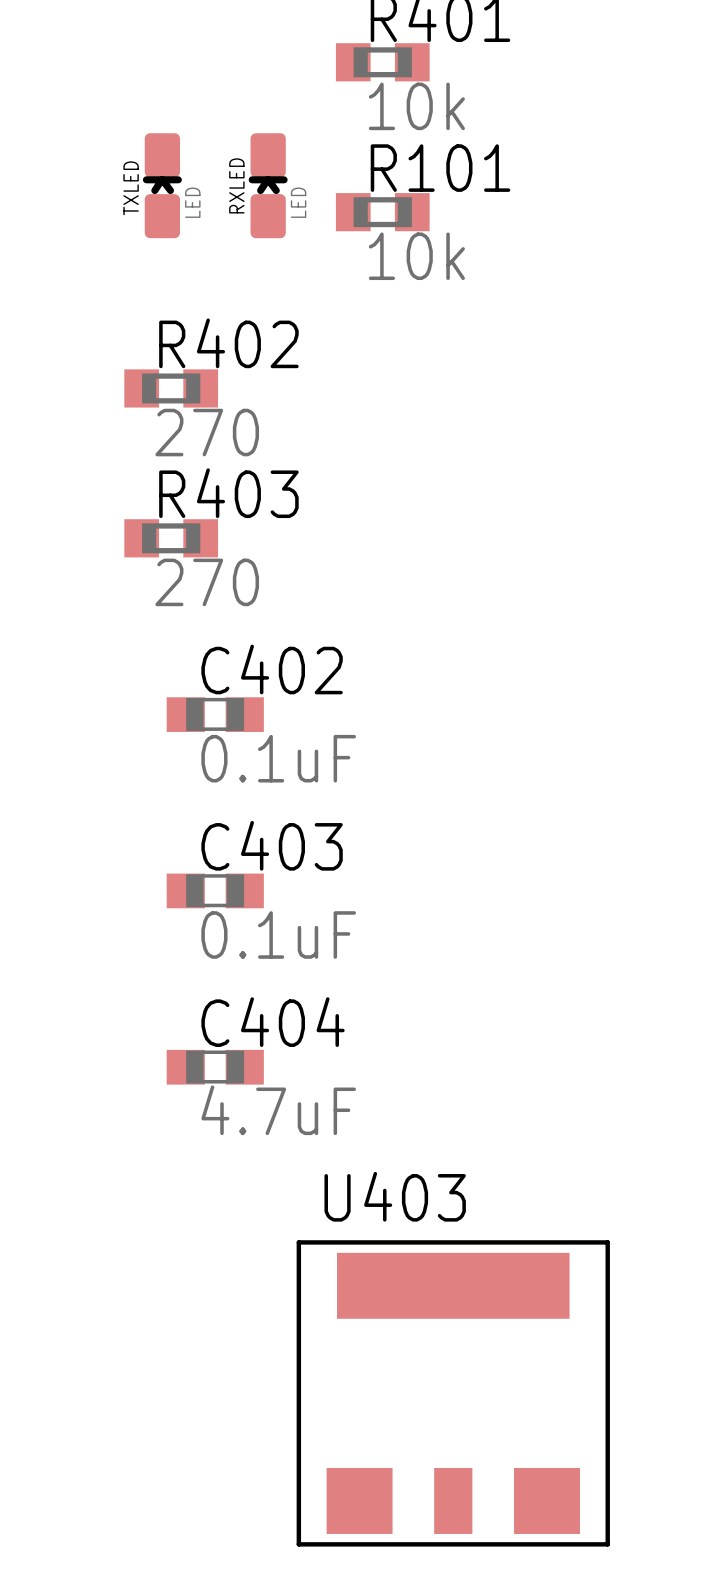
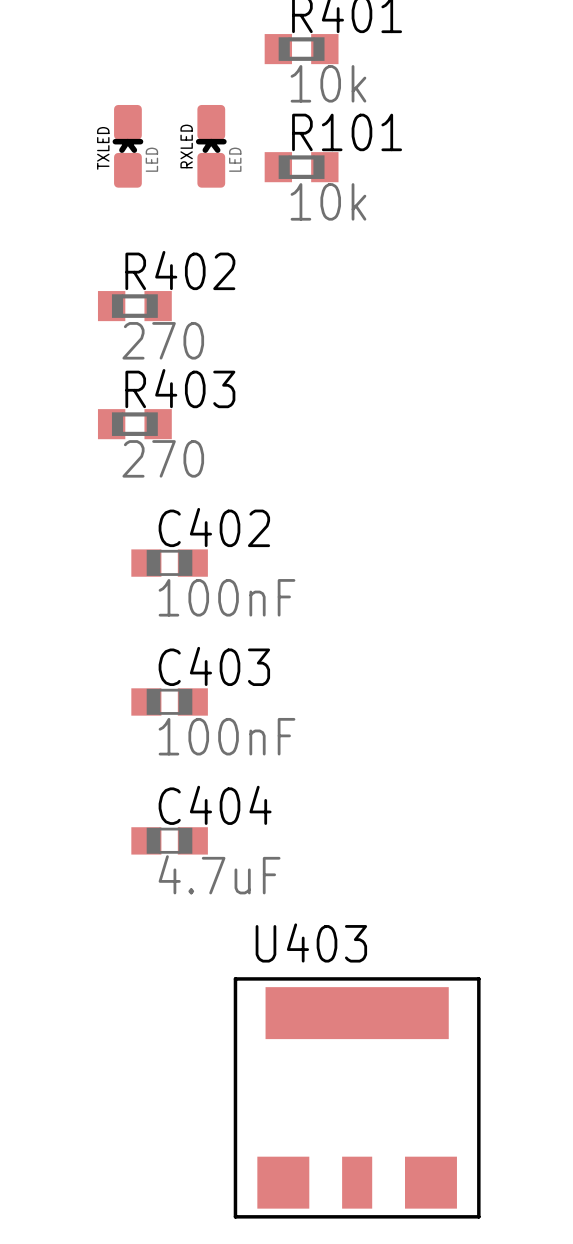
C402 value: 0.1uF (278, 758) -> 100nF (227, 597)
C403 value: 0.1uF (278, 935) -> 100nF (227, 736)

